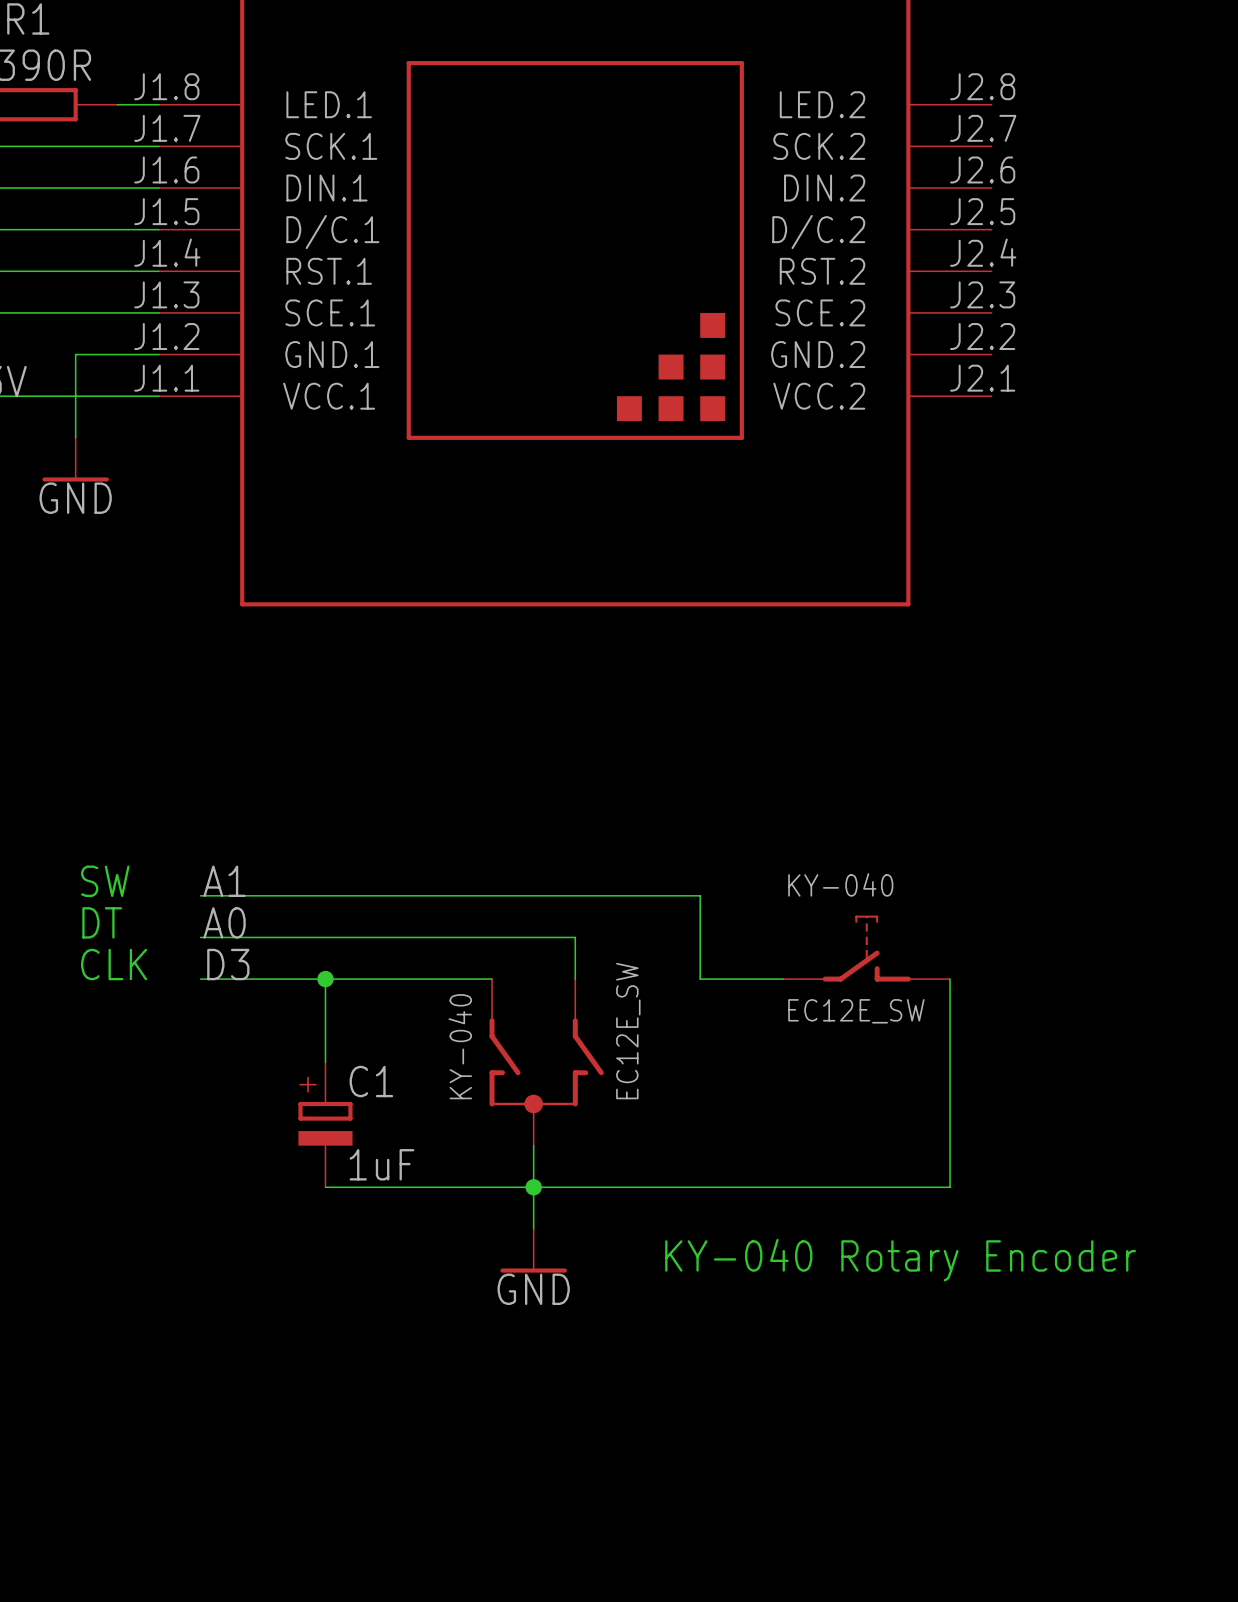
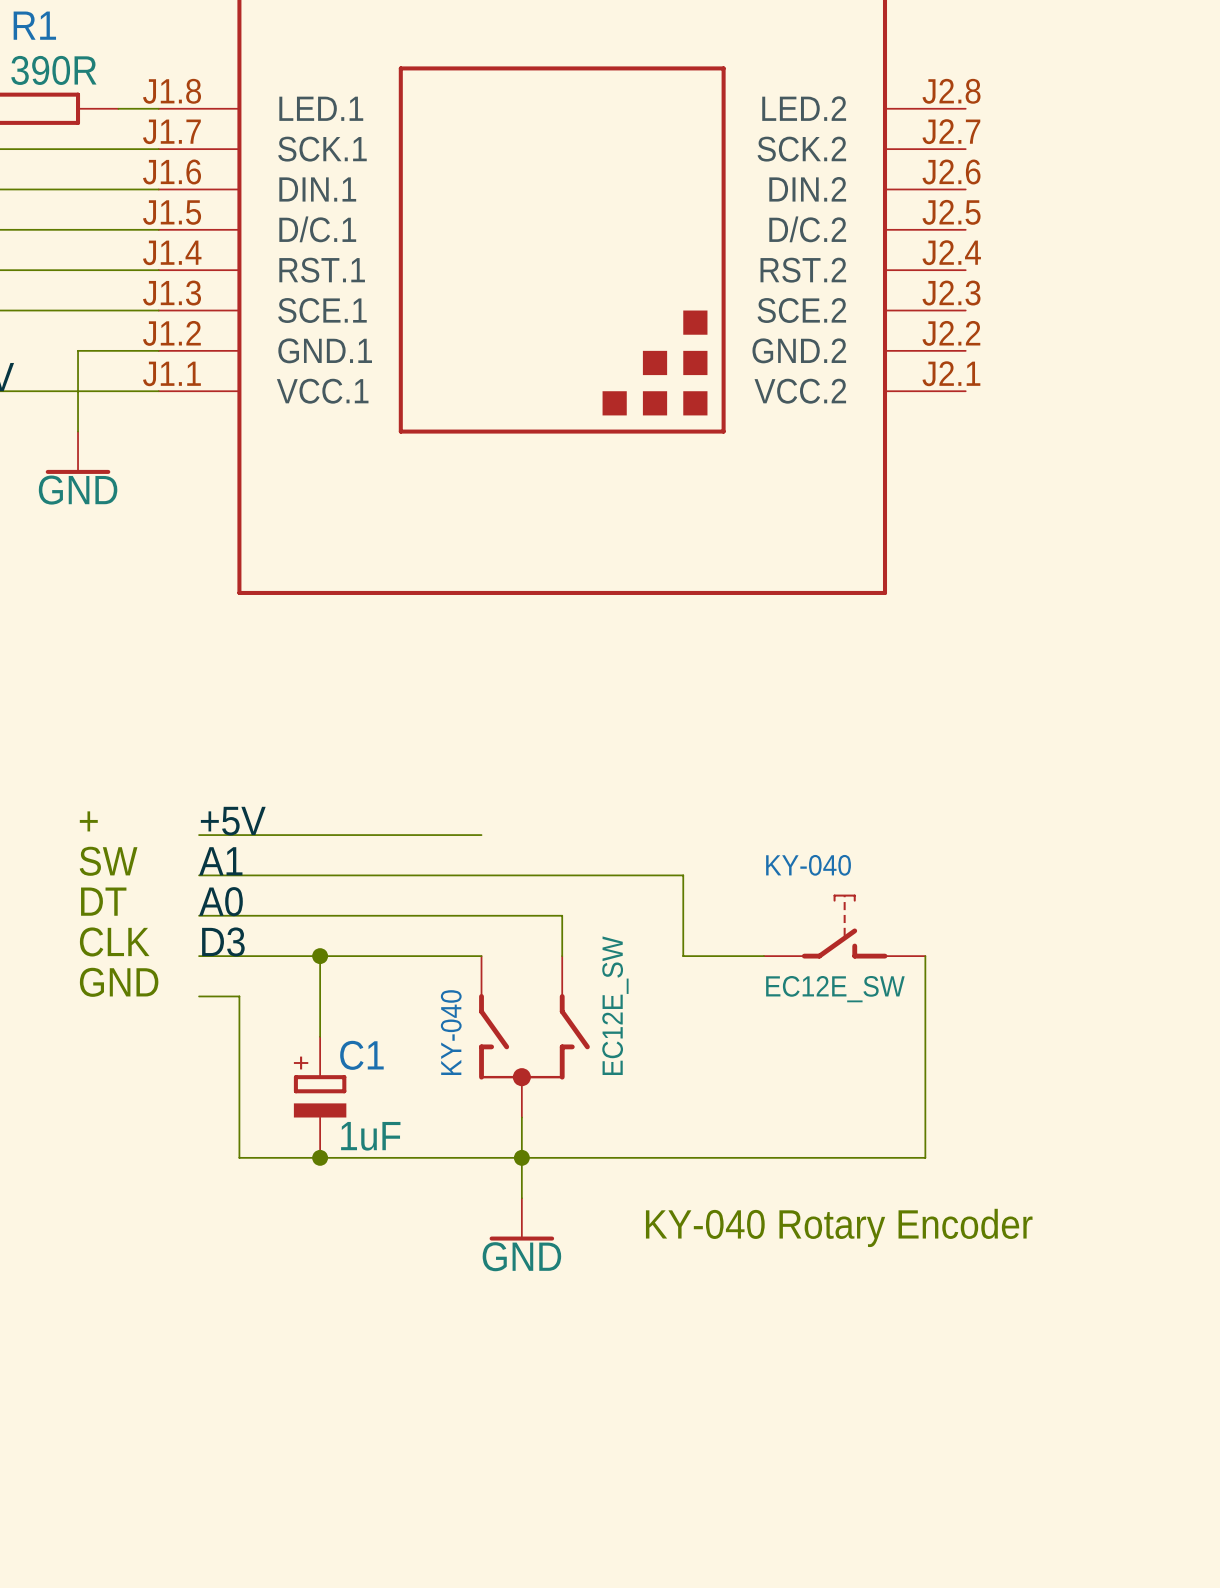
label: none -> +5V (233, 821)
text: none -> + (88, 821)
wire: none -> (199, 835) (481, 835)
text: none -> GND (119, 982)
wire: none -> (199, 996) (239, 996) (239, 1157) (320, 1157)
junction: none -> (320, 1157)

